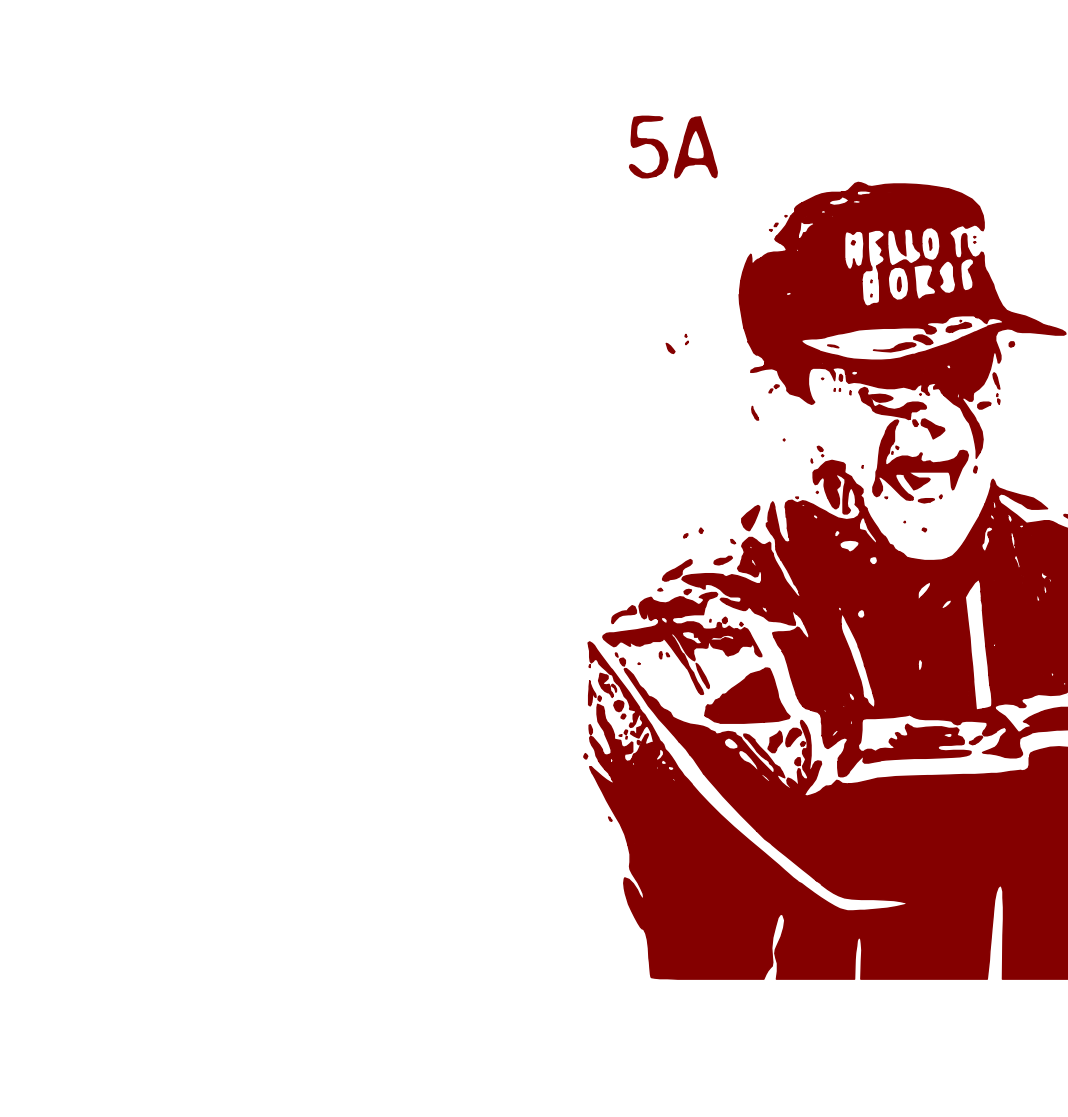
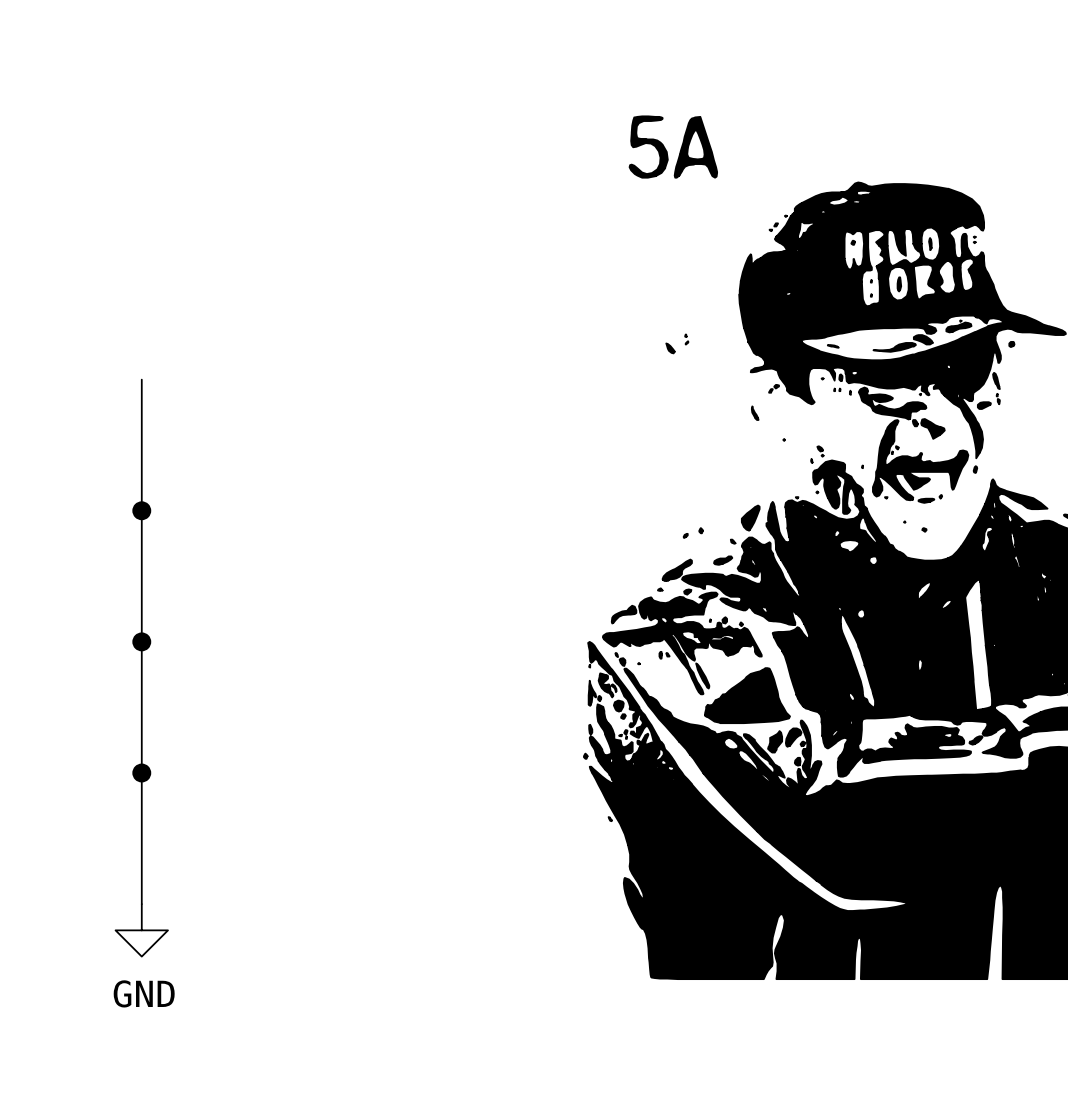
wire: none -> (141, 379) (141, 904)
junction: none -> (141, 510)
junction: none -> (141, 641)
junction: none -> (141, 773)
power symbol: none -> GND (141, 930)

